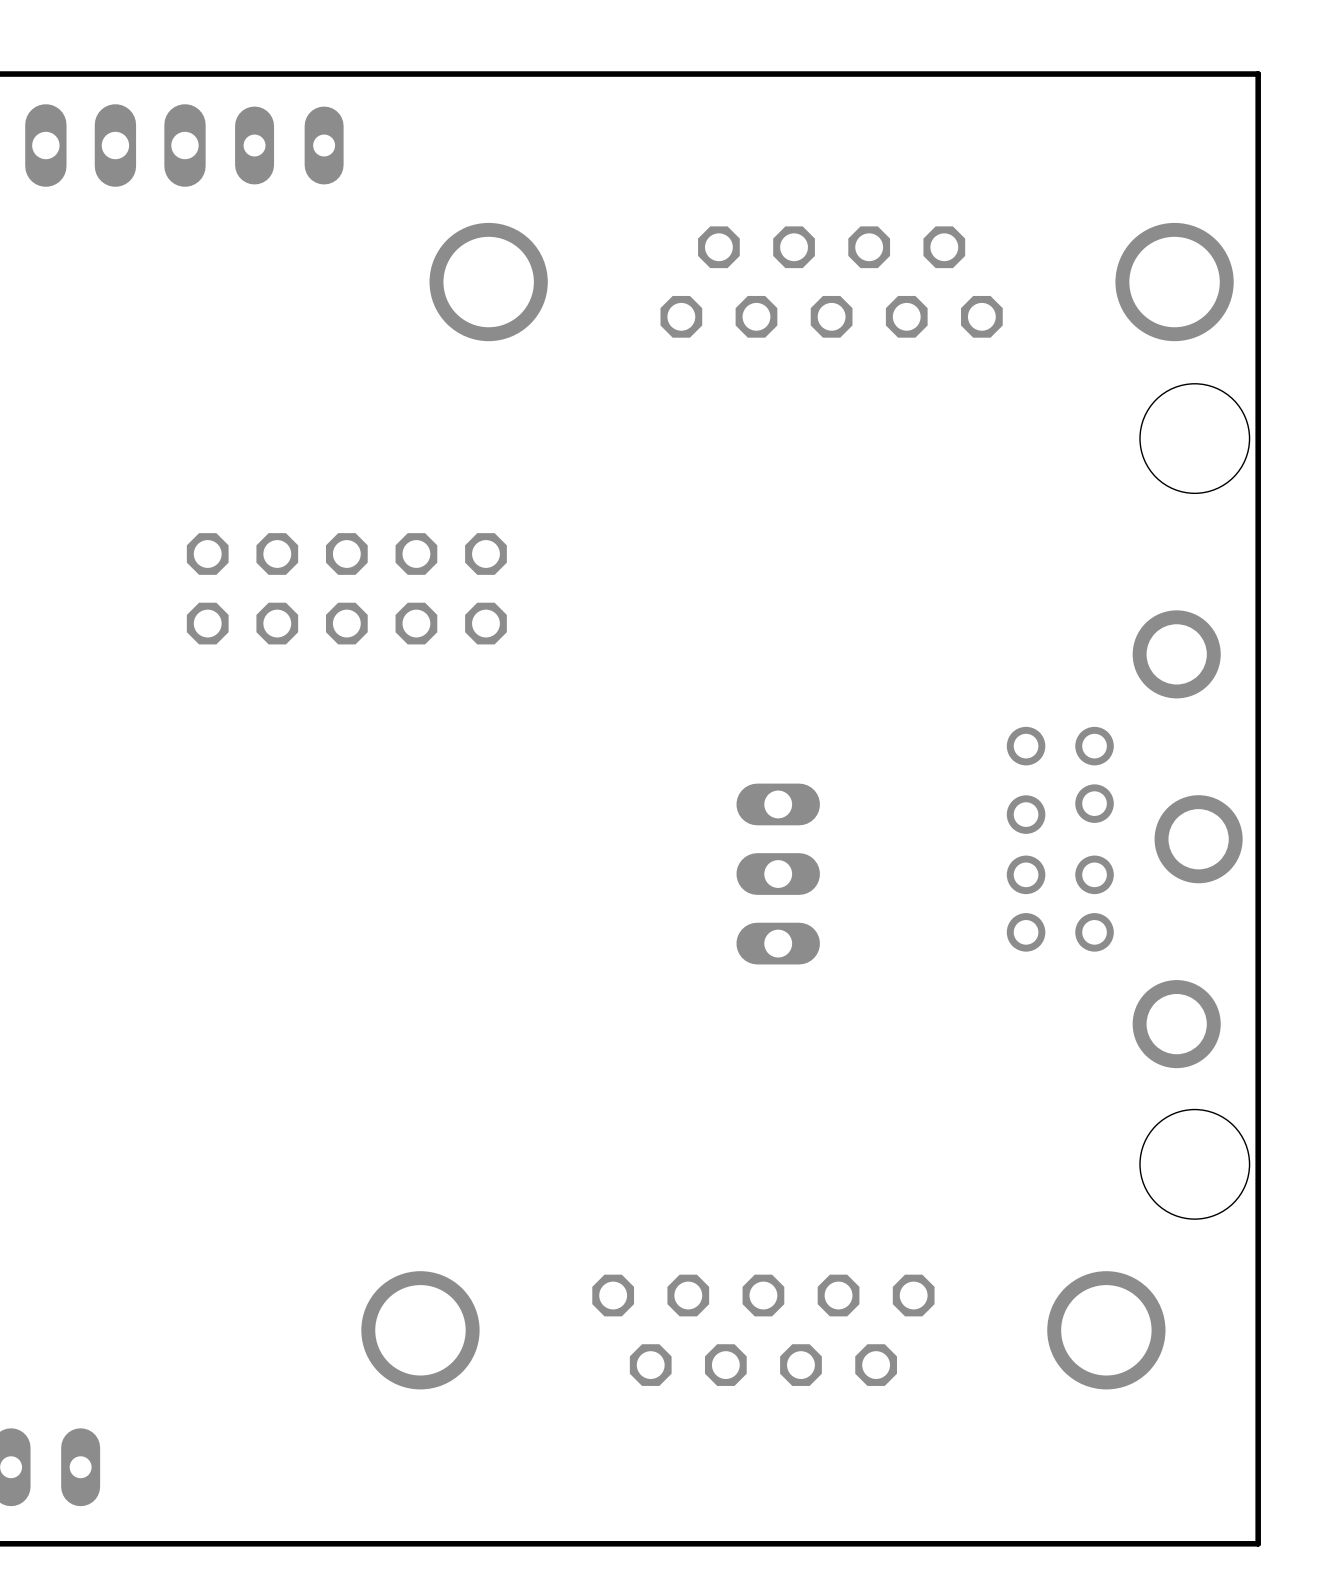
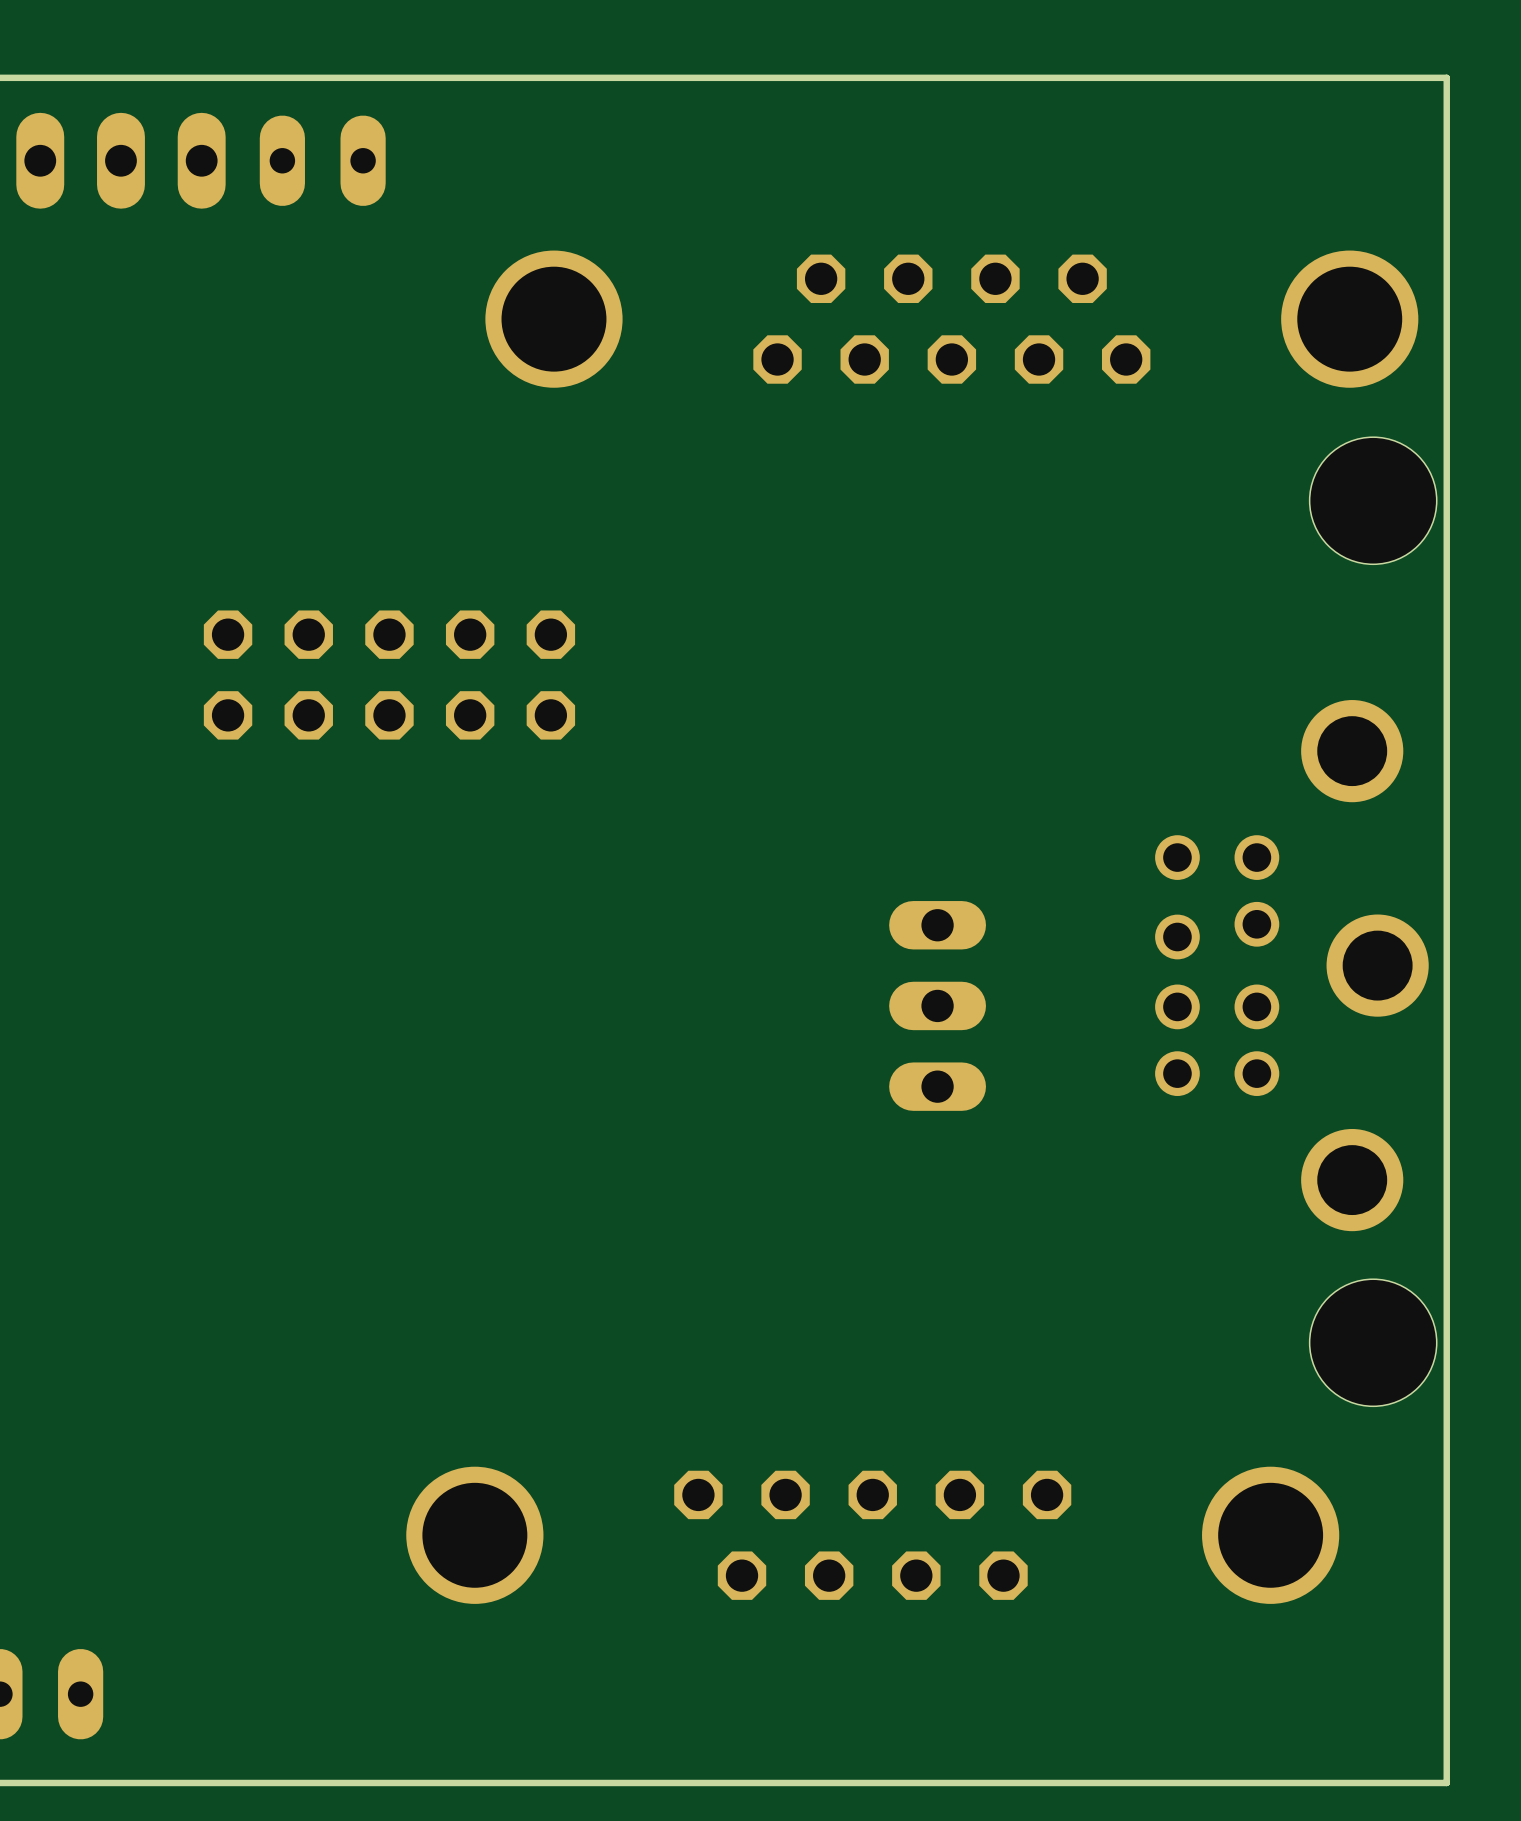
part position: (778, 874) -> (937, 1005)

